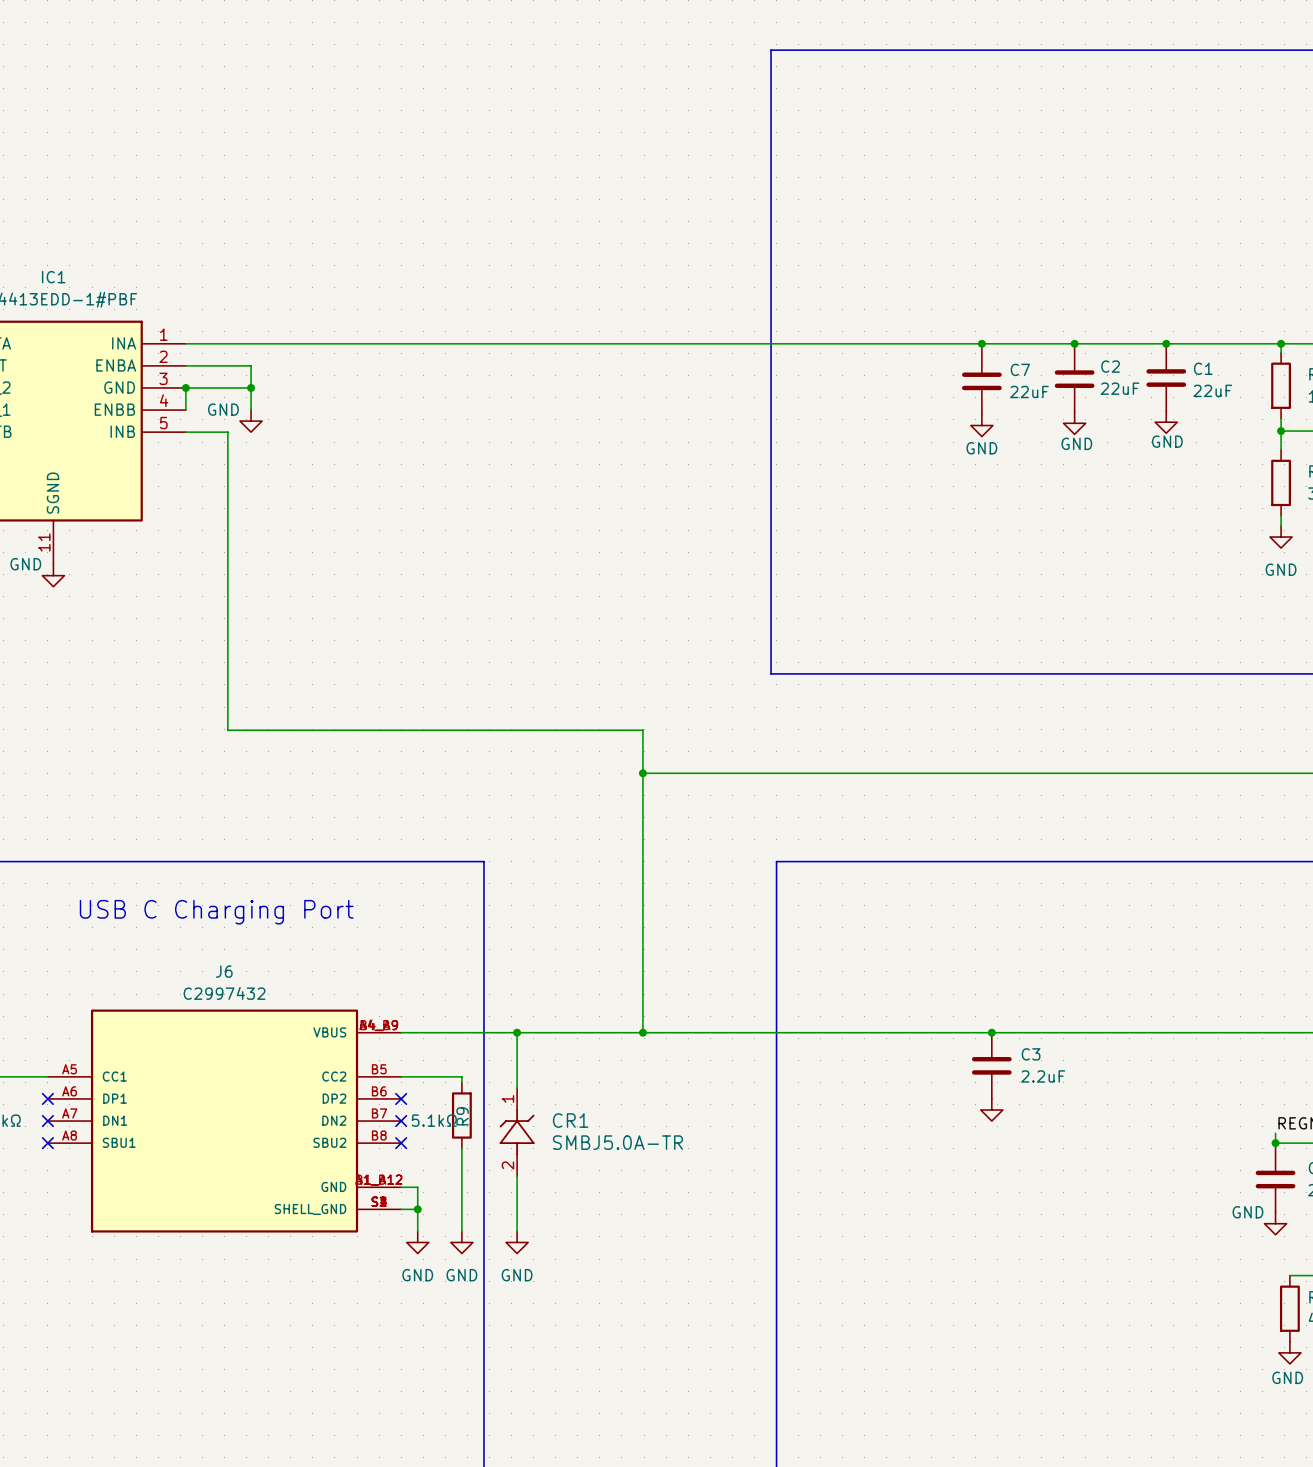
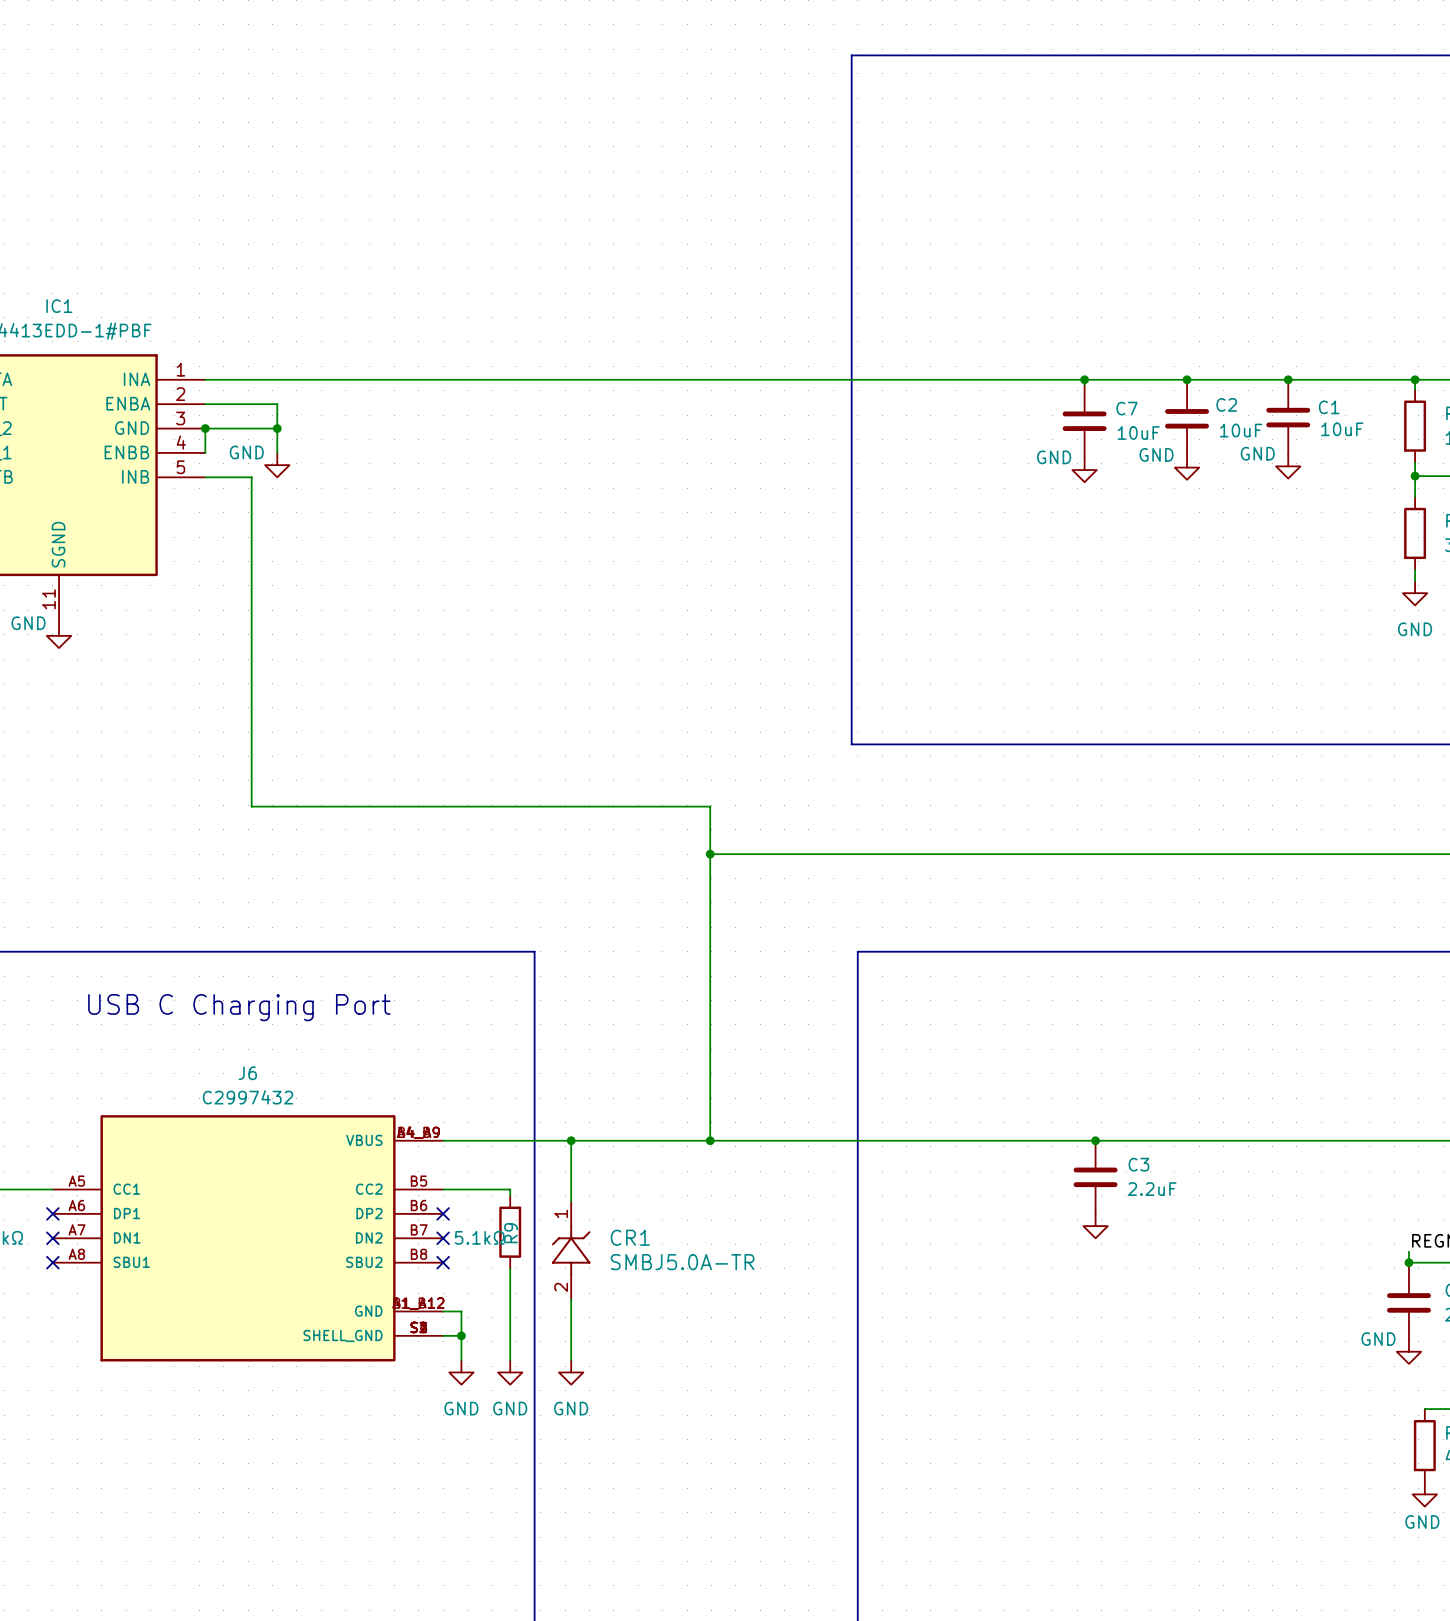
C2 value: 22uF (1120, 388) -> 10uF (1241, 430)
C1 value: 22uF (1212, 390) -> 10uF (1342, 429)
C7 value: 22uF (1029, 391) -> 10uF (1138, 432)
power symbol text position: GND (1167, 441) -> GND (1257, 453)
power symbol text position: GND (1076, 443) -> GND (1156, 454)
power symbol text position: GND (981, 448) -> GND (1054, 457)

